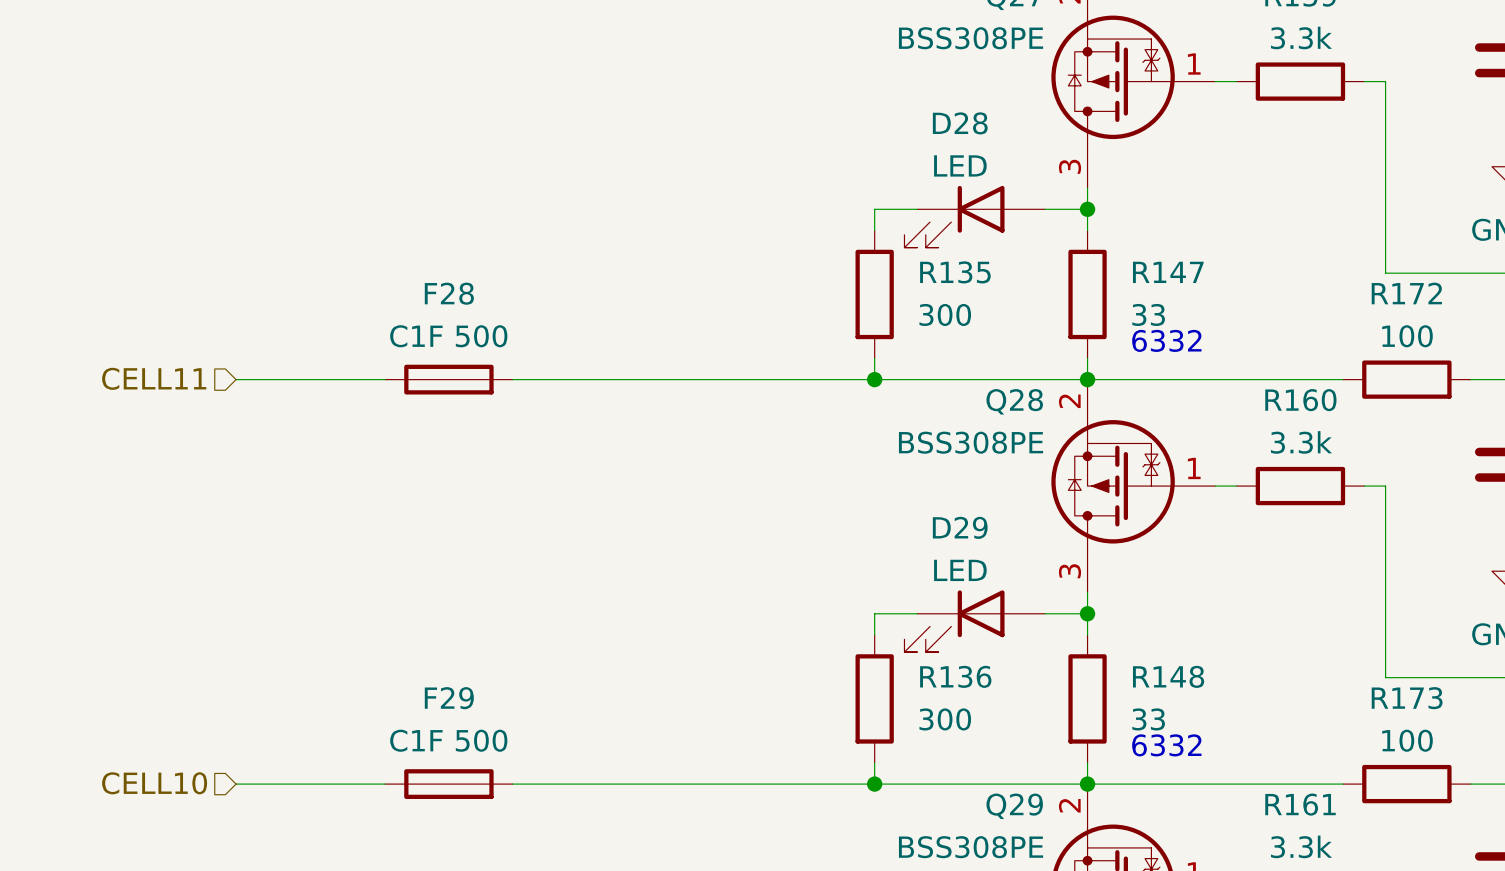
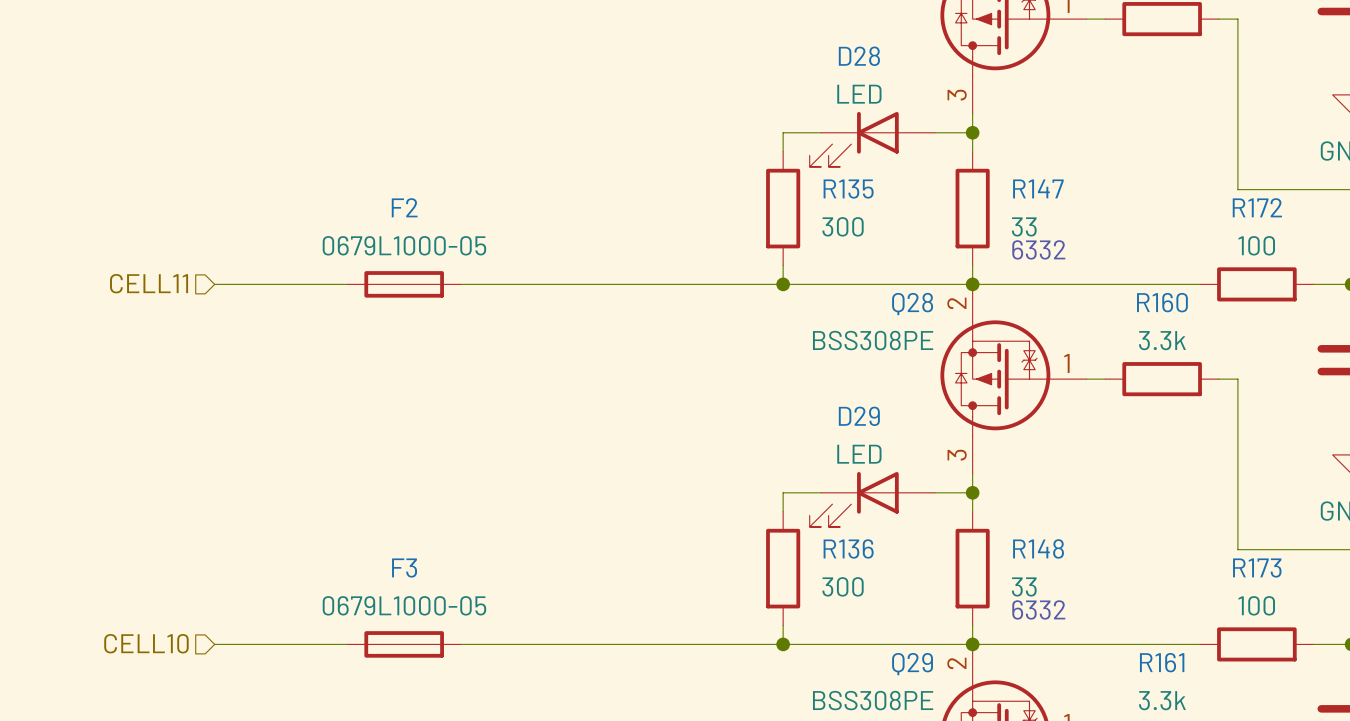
F28 name: F28 (449, 293) -> F2 (404, 207)
F28 value: C1F 500 (448, 336) -> 0679L1000-05 (404, 245)
F29 name: F29 (449, 698) -> F3 (404, 568)
F29 value: C1F 500 (448, 740) -> 0679L1000-05 (404, 605)

